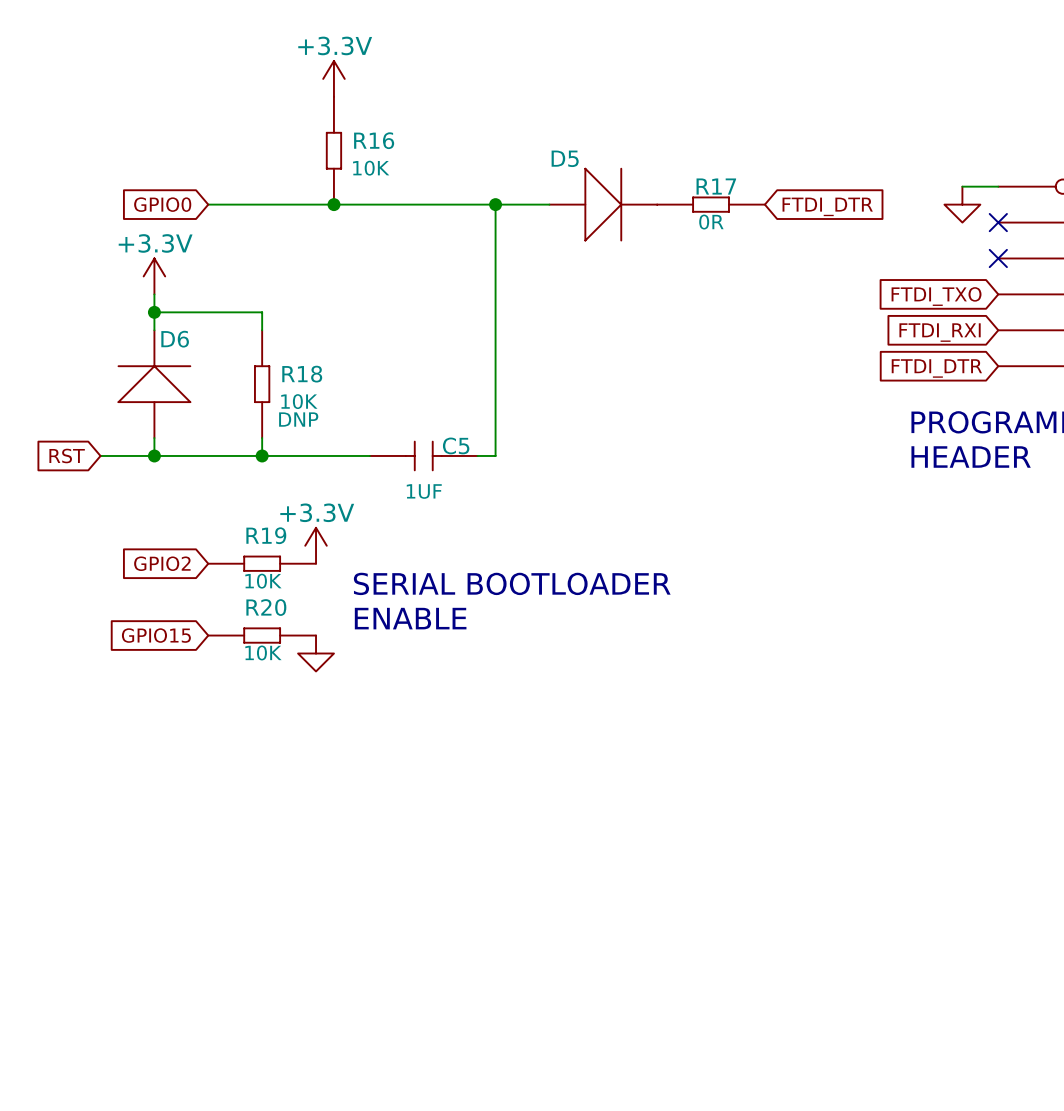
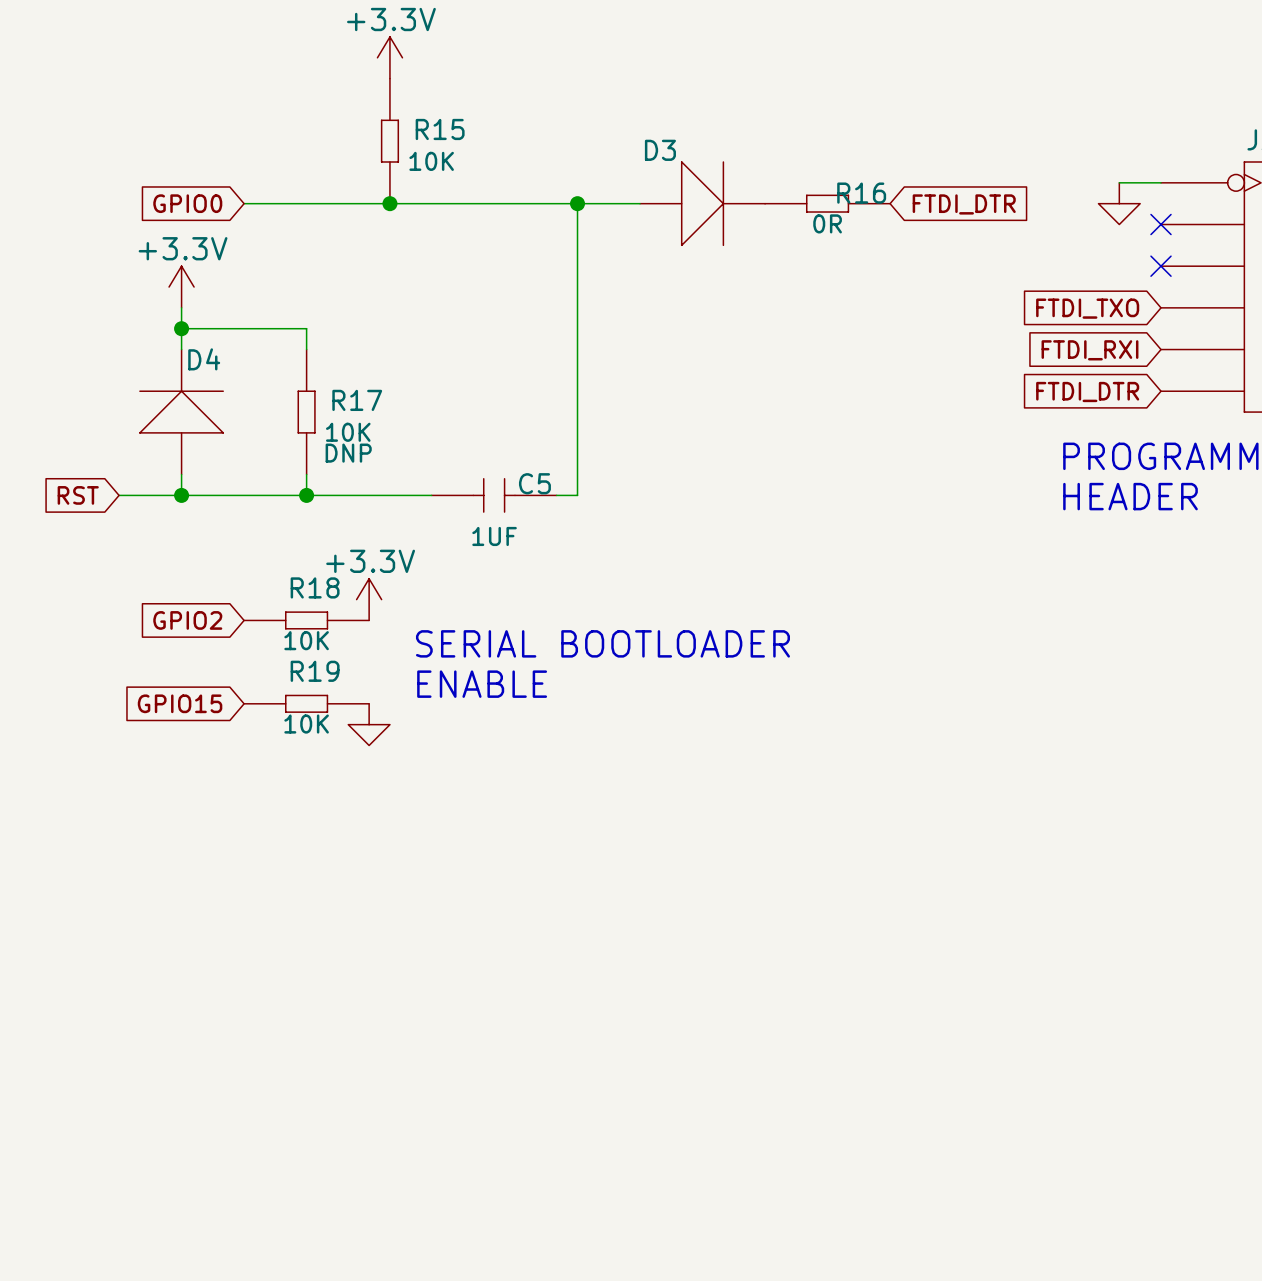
R16 name: R16 (374, 140) -> R15 (440, 129)
D5 name: D5 (565, 158) -> D3 (660, 150)
R17 name: R17 (716, 186) -> R16 (861, 193)
D6 name: D6 (175, 339) -> D4 (204, 359)
R18 name: R18 (302, 374) -> R17 (357, 400)
R19 name: R19 (266, 535) -> R18 (315, 587)
R20 name: R20 (266, 607) -> R19 (315, 671)

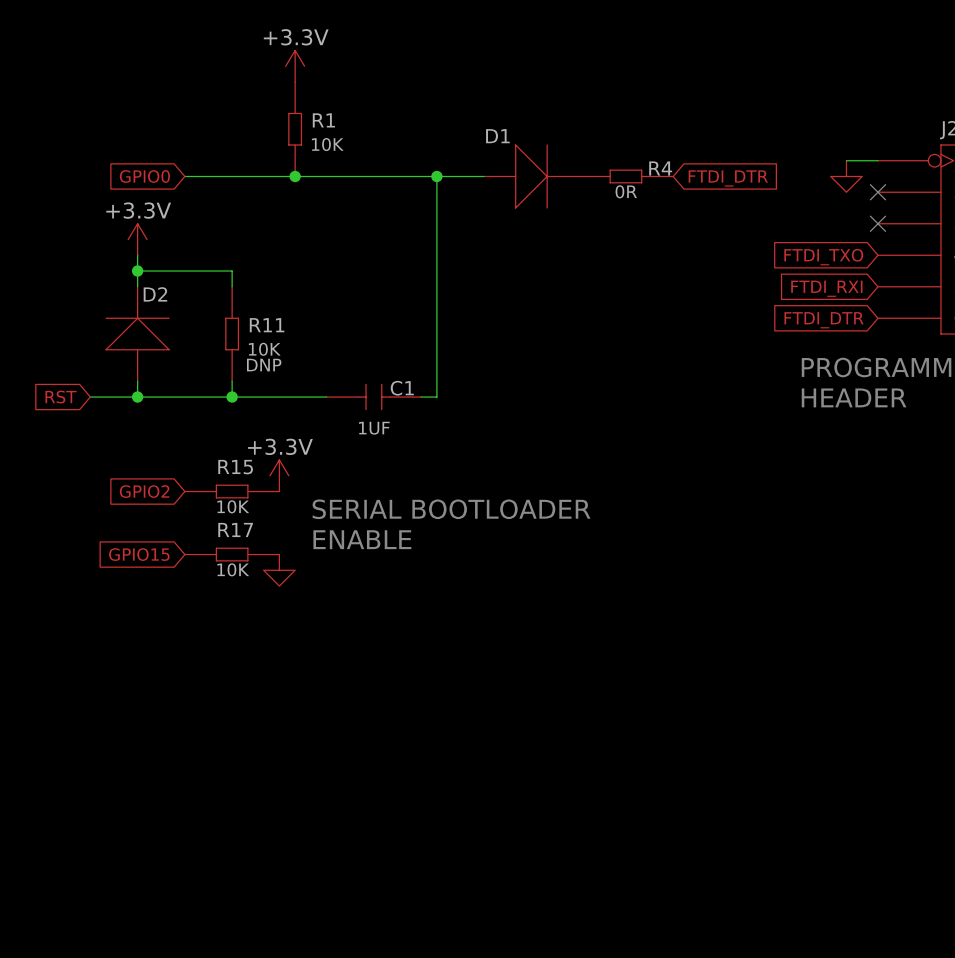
R15 name: R15 (440, 129) -> R1 (323, 120)
D3 name: D3 (660, 150) -> D1 (497, 136)
R16 name: R16 (861, 193) -> R4 (660, 168)
D4 name: D4 (204, 359) -> D2 (155, 294)
R17 name: R17 (357, 400) -> R11 (267, 325)
C5 name: C5 (534, 483) -> C1 (402, 388)
R18 name: R18 (315, 587) -> R15 (235, 467)
R19 name: R19 (315, 671) -> R17 (235, 529)

